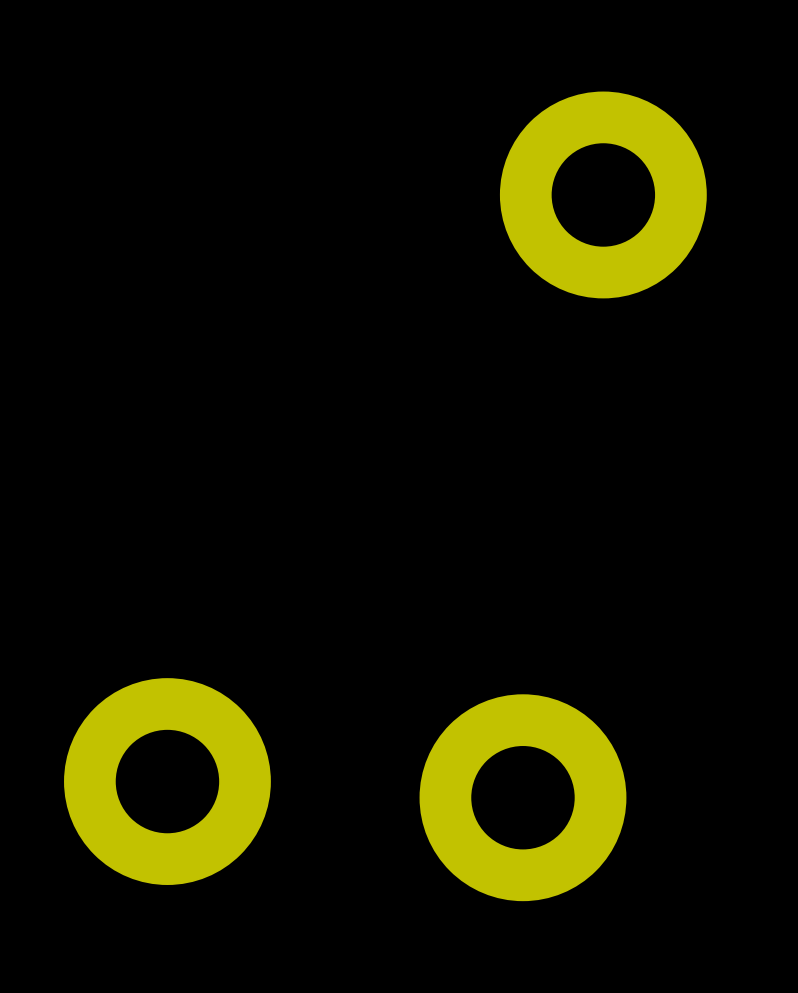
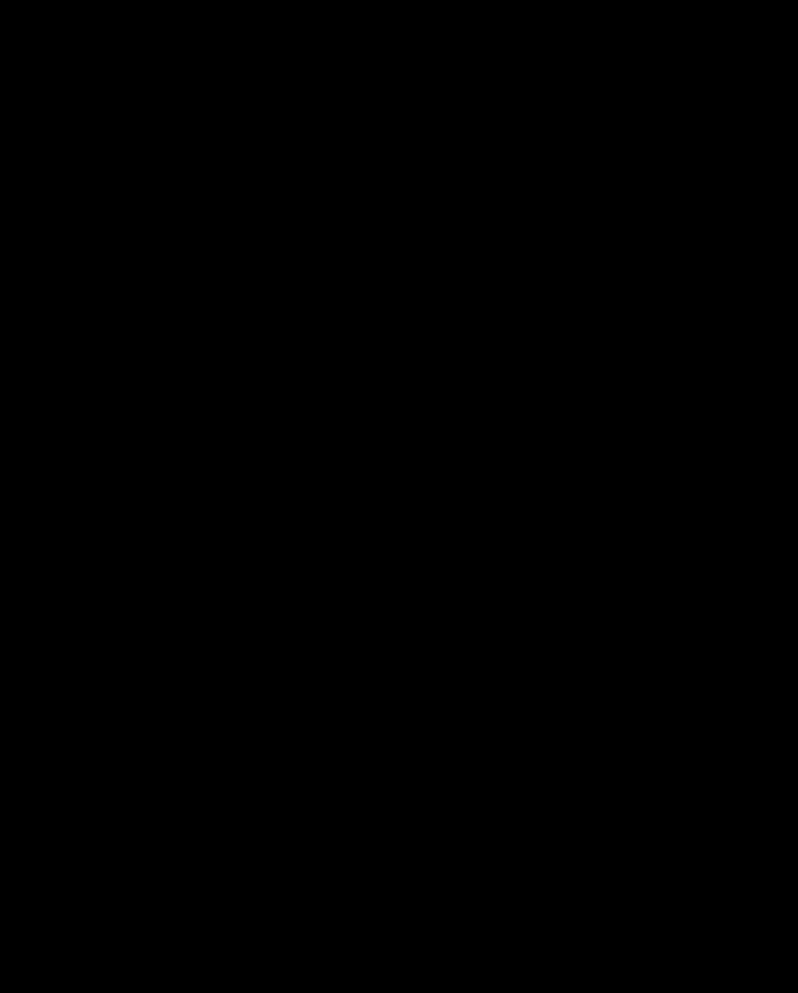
part: (603, 194) -> none
part: (167, 781) -> none
part: (522, 797) -> none

